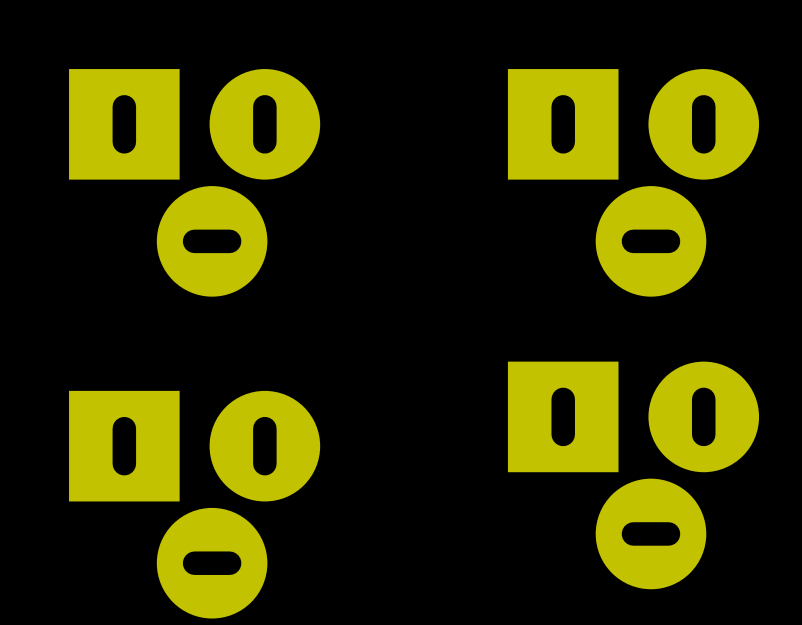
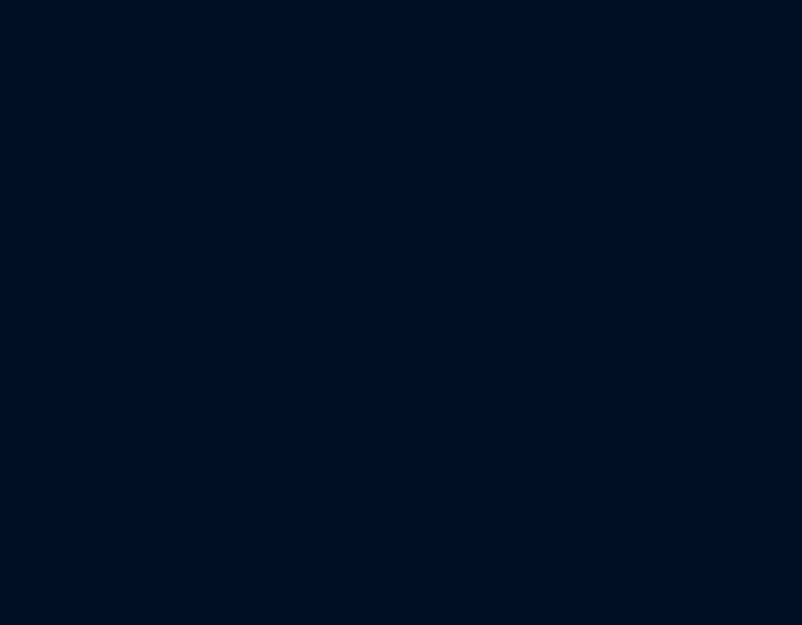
part: (194, 182) -> none
part: (633, 182) -> none
part: (633, 475) -> none
part: (194, 504) -> none

